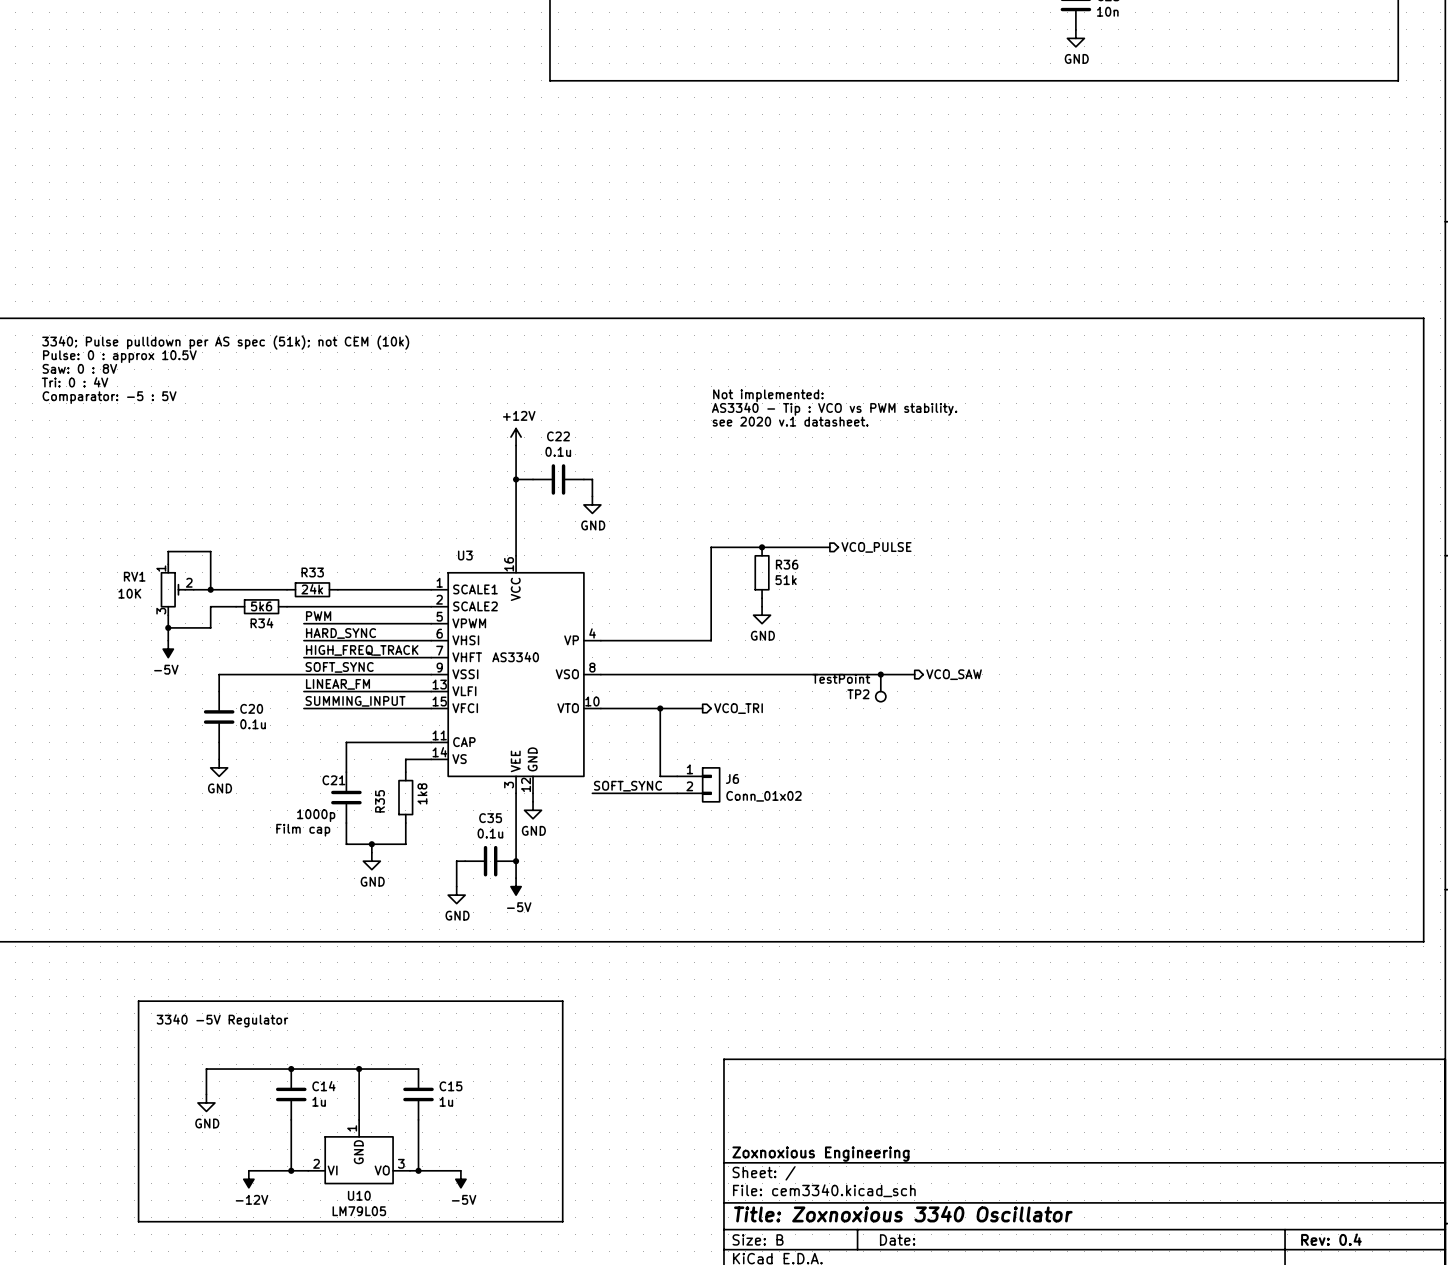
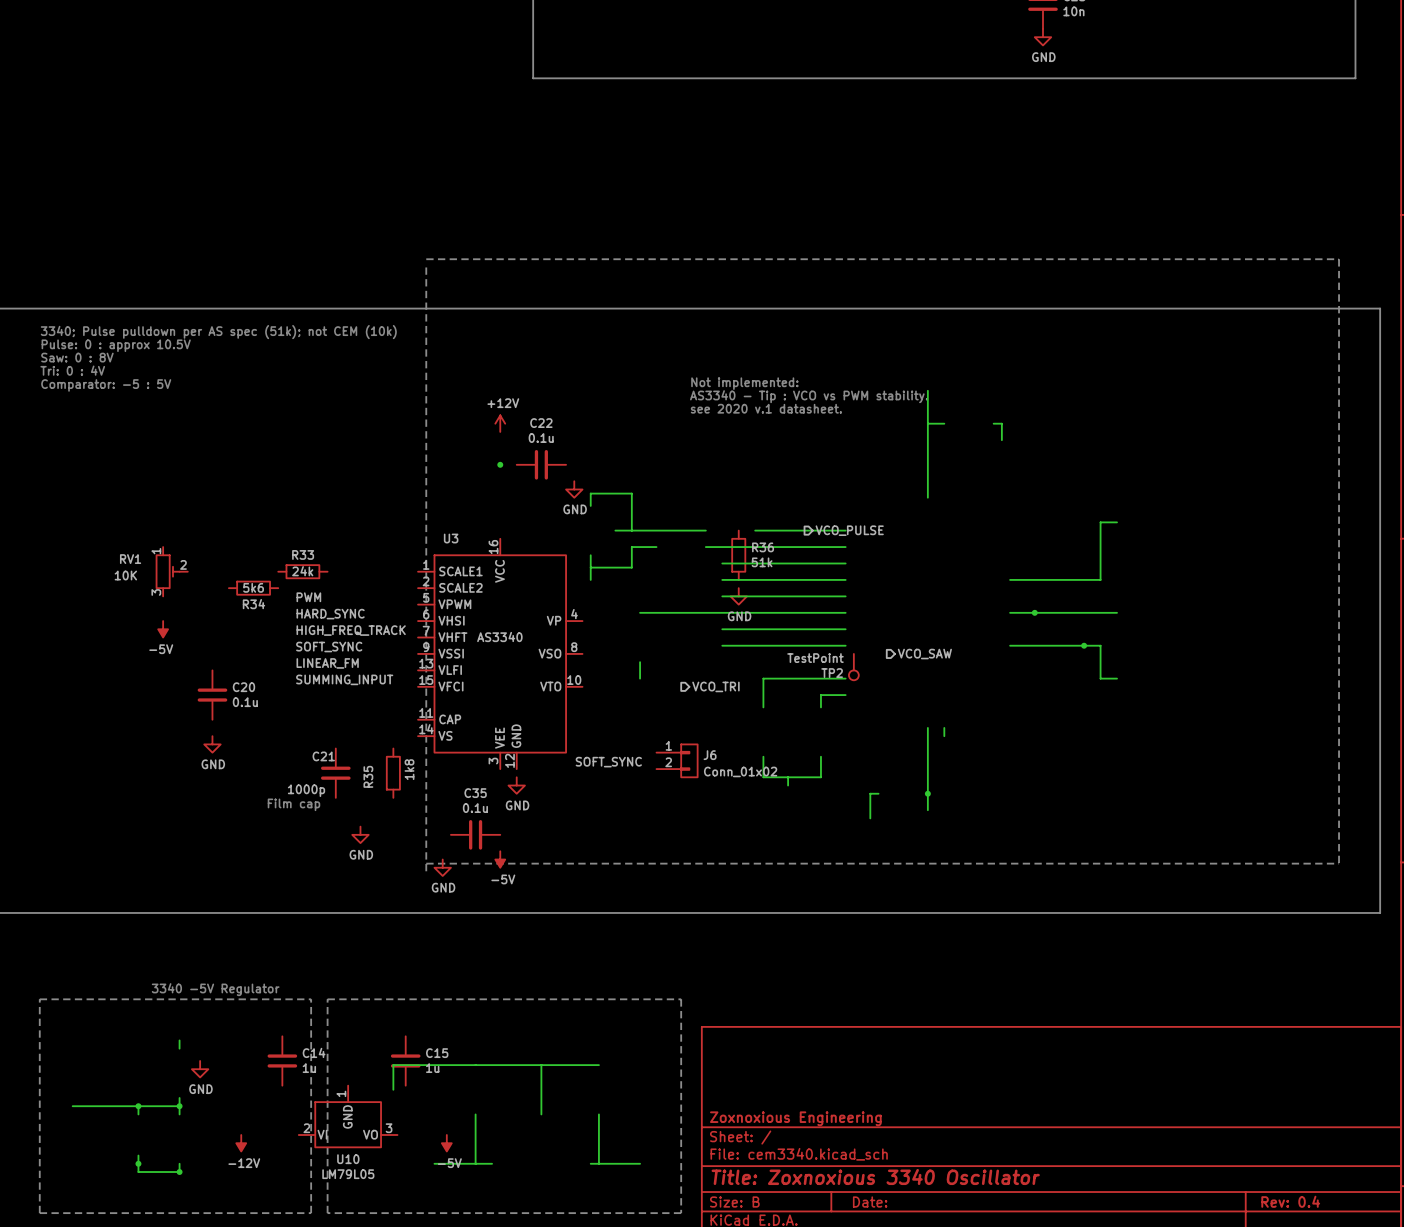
line: none -> (426, 259) (1339, 259) (1339, 863) (426, 863)
line: none -> (426, 267) (426, 871)
wire: none -> (927, 390) (927, 497)
wire: none -> (927, 423) (944, 423)
wire: none -> (993, 423) (1001, 423) (1001, 440)
wire: (516, 445) (516, 555) -> none
wire: (516, 479) (533, 479) -> none
wire: (583, 479) (592, 479) (592, 496) -> none
wire: none -> (590, 505) (590, 493) (631, 493) (631, 530)
wire: none -> (1117, 522) (1100, 522) (1100, 579) (1010, 579)
wire: (711, 547) (711, 640) (600, 640) -> (689, 530) (615, 530)
wire: (728, 547) (779, 547) -> none
junction: (762, 547) -> none
wire: none -> (804, 530) (845, 530)
wire: (168, 564) (168, 551) (210, 551) (210, 589) -> none
wire: none -> (656, 547) (631, 547) (631, 567) (590, 567)
wire: none -> (705, 547) (845, 547)
wire: none -> (590, 555) (590, 579)
wire: none -> (722, 563) (845, 563)
wire: (193, 589) (287, 589) -> none
junction: (210, 589) -> none
wire: (337, 589) (431, 589) -> none
wire: none -> (722, 579) (845, 579)
wire: (762, 598) (762, 606) -> none
wire: (236, 606) (210, 606) (210, 627) (168, 627) -> none
wire: (287, 606) (431, 606) -> none
wire: (168, 615) (168, 640) -> none
wire: none -> (722, 596) (845, 596)
wire: (303, 623) (431, 623) -> none
junction: (168, 627) -> none
wire: none -> (640, 612) (845, 612)
wire: none -> (1010, 612) (1117, 612)
junction: none -> (1034, 612)
wire: (303, 640) (431, 640) -> none
wire: none -> (722, 629) (845, 629)
wire: (303, 657) (431, 657) -> none
wire: none -> (722, 645) (845, 645)
wire: none -> (1010, 645) (1100, 645) (1100, 678) (1117, 678)
junction: none -> (1084, 645)
wire: (431, 674) (219, 674) (219, 691) -> none
wire: (600, 674) (914, 674) -> none
junction: (880, 674) -> none
wire: none -> (640, 662) (640, 678)
wire: (303, 691) (431, 691) -> none
wire: none -> (845, 678) (763, 678) (763, 707)
wire: (303, 708) (431, 708) -> none
wire: (600, 708) (702, 708) -> none
wire: (660, 708) (660, 776) (677, 776) -> none
junction: (660, 708) -> none
wire: none -> (845, 695) (820, 695) (820, 707)
wire: (219, 742) (219, 759) -> none
wire: (431, 742) (346, 742) (346, 772) -> none
wire: none -> (927, 727) (927, 810)
wire: none -> (944, 727) (944, 736)
wire: (431, 759) (405, 759) (405, 772) -> none
wire: none -> (763, 756) (763, 777) (820, 777) (820, 756)
wire: (516, 793) (516, 878) -> none
wire: (533, 793) (533, 801) -> none
wire: (592, 793) (677, 793) -> none
wire: none -> (788, 777) (788, 785)
wire: none -> (878, 793) (870, 793) (870, 818)
junction: none -> (927, 793)
wire: (346, 823) (346, 844) (405, 844) (405, 823) -> none
wire: (371, 844) (371, 852) -> none
junction: (371, 844) -> none
wire: (465, 861) (456, 861) (456, 886) -> none
junction: (516, 861) -> none
line: (138, 1001) (138, 1221) (562, 1221) (562, 1001) (138, 1001) -> none
line: none -> (39, 999) (39, 1213) (311, 1213) (311, 999) (39, 999)
line: none -> (327, 999) (327, 1213) (681, 1213) (681, 999) (327, 999)
junction: (291, 1069) -> none
wire: (359, 1069) (359, 1119) -> none
junction: (359, 1069) -> none
wire: (418, 1069) (206, 1069) (206, 1094) -> none
wire: none -> (179, 1040) (179, 1048)
wire: none -> (541, 1065) (541, 1114)
wire: none -> (598, 1065) (393, 1065) (393, 1089)
wire: (291, 1119) (291, 1170) -> none
wire: (418, 1119) (418, 1170) -> (475, 1114) (475, 1163)
wire: none -> (179, 1097) (179, 1114)
wire: none -> (72, 1106) (179, 1106)
wire: none -> (138, 1106) (138, 1114)
junction: none -> (138, 1106)
junction: none -> (179, 1106)
wire: none -> (598, 1114) (598, 1163)
wire: (248, 1170) (308, 1170) -> none
junction: (291, 1170) -> none
wire: (410, 1170) (460, 1170) -> none
junction: (418, 1170) -> none
wire: none -> (138, 1155) (138, 1172) (179, 1172) (179, 1163)
junction: none -> (138, 1163)
wire: none -> (434, 1163) (492, 1163)
wire: none -> (590, 1163) (640, 1163)
junction: none -> (179, 1172)

